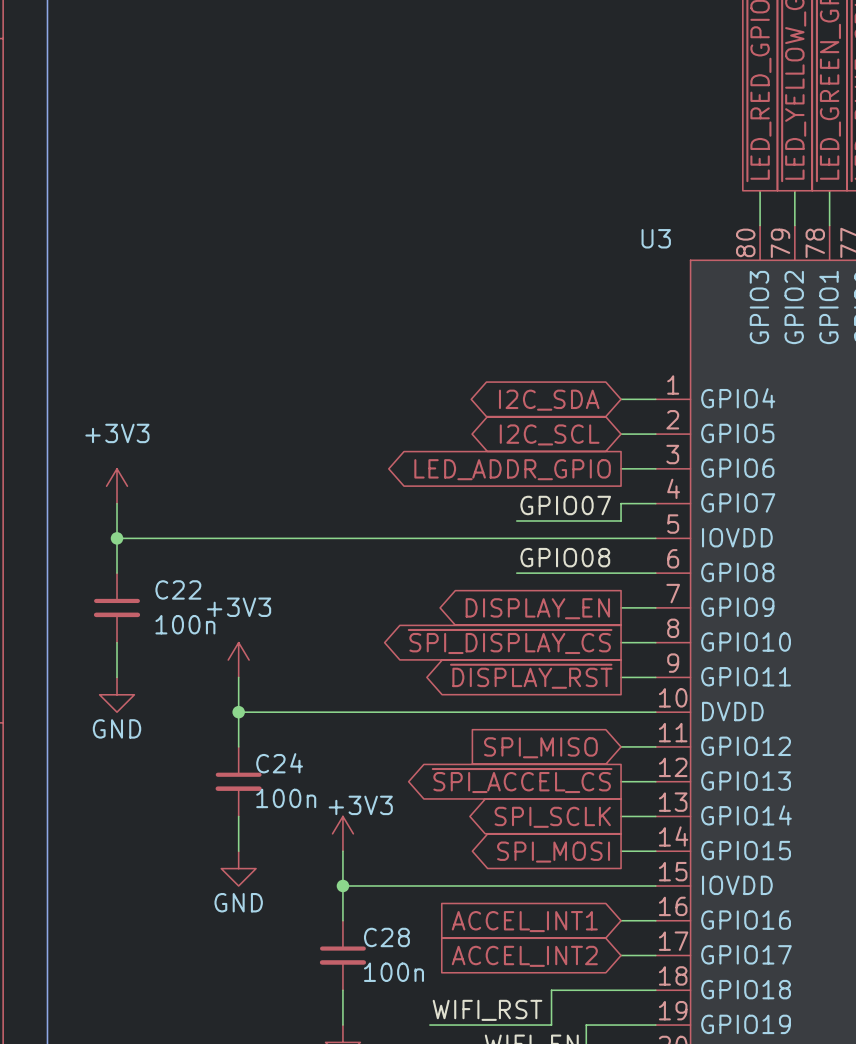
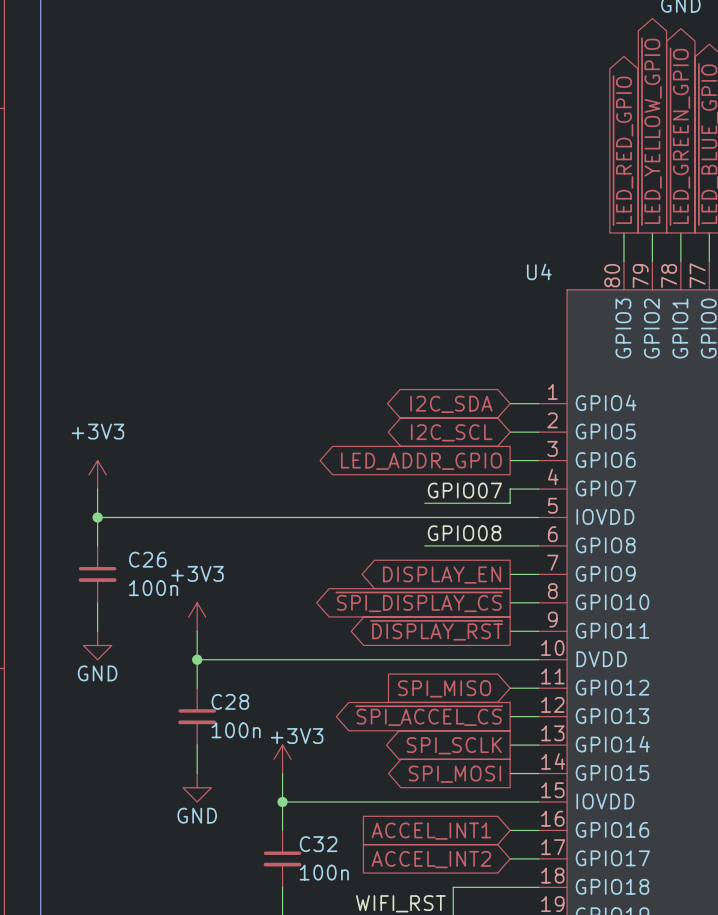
U3 name: U3 (656, 238) -> U4 (539, 271)
C22 name: C22 (178, 589) -> C26 (147, 559)
C24 name: C24 (279, 763) -> C28 (230, 701)
C28 name: C28 (386, 937) -> C32 (318, 844)

